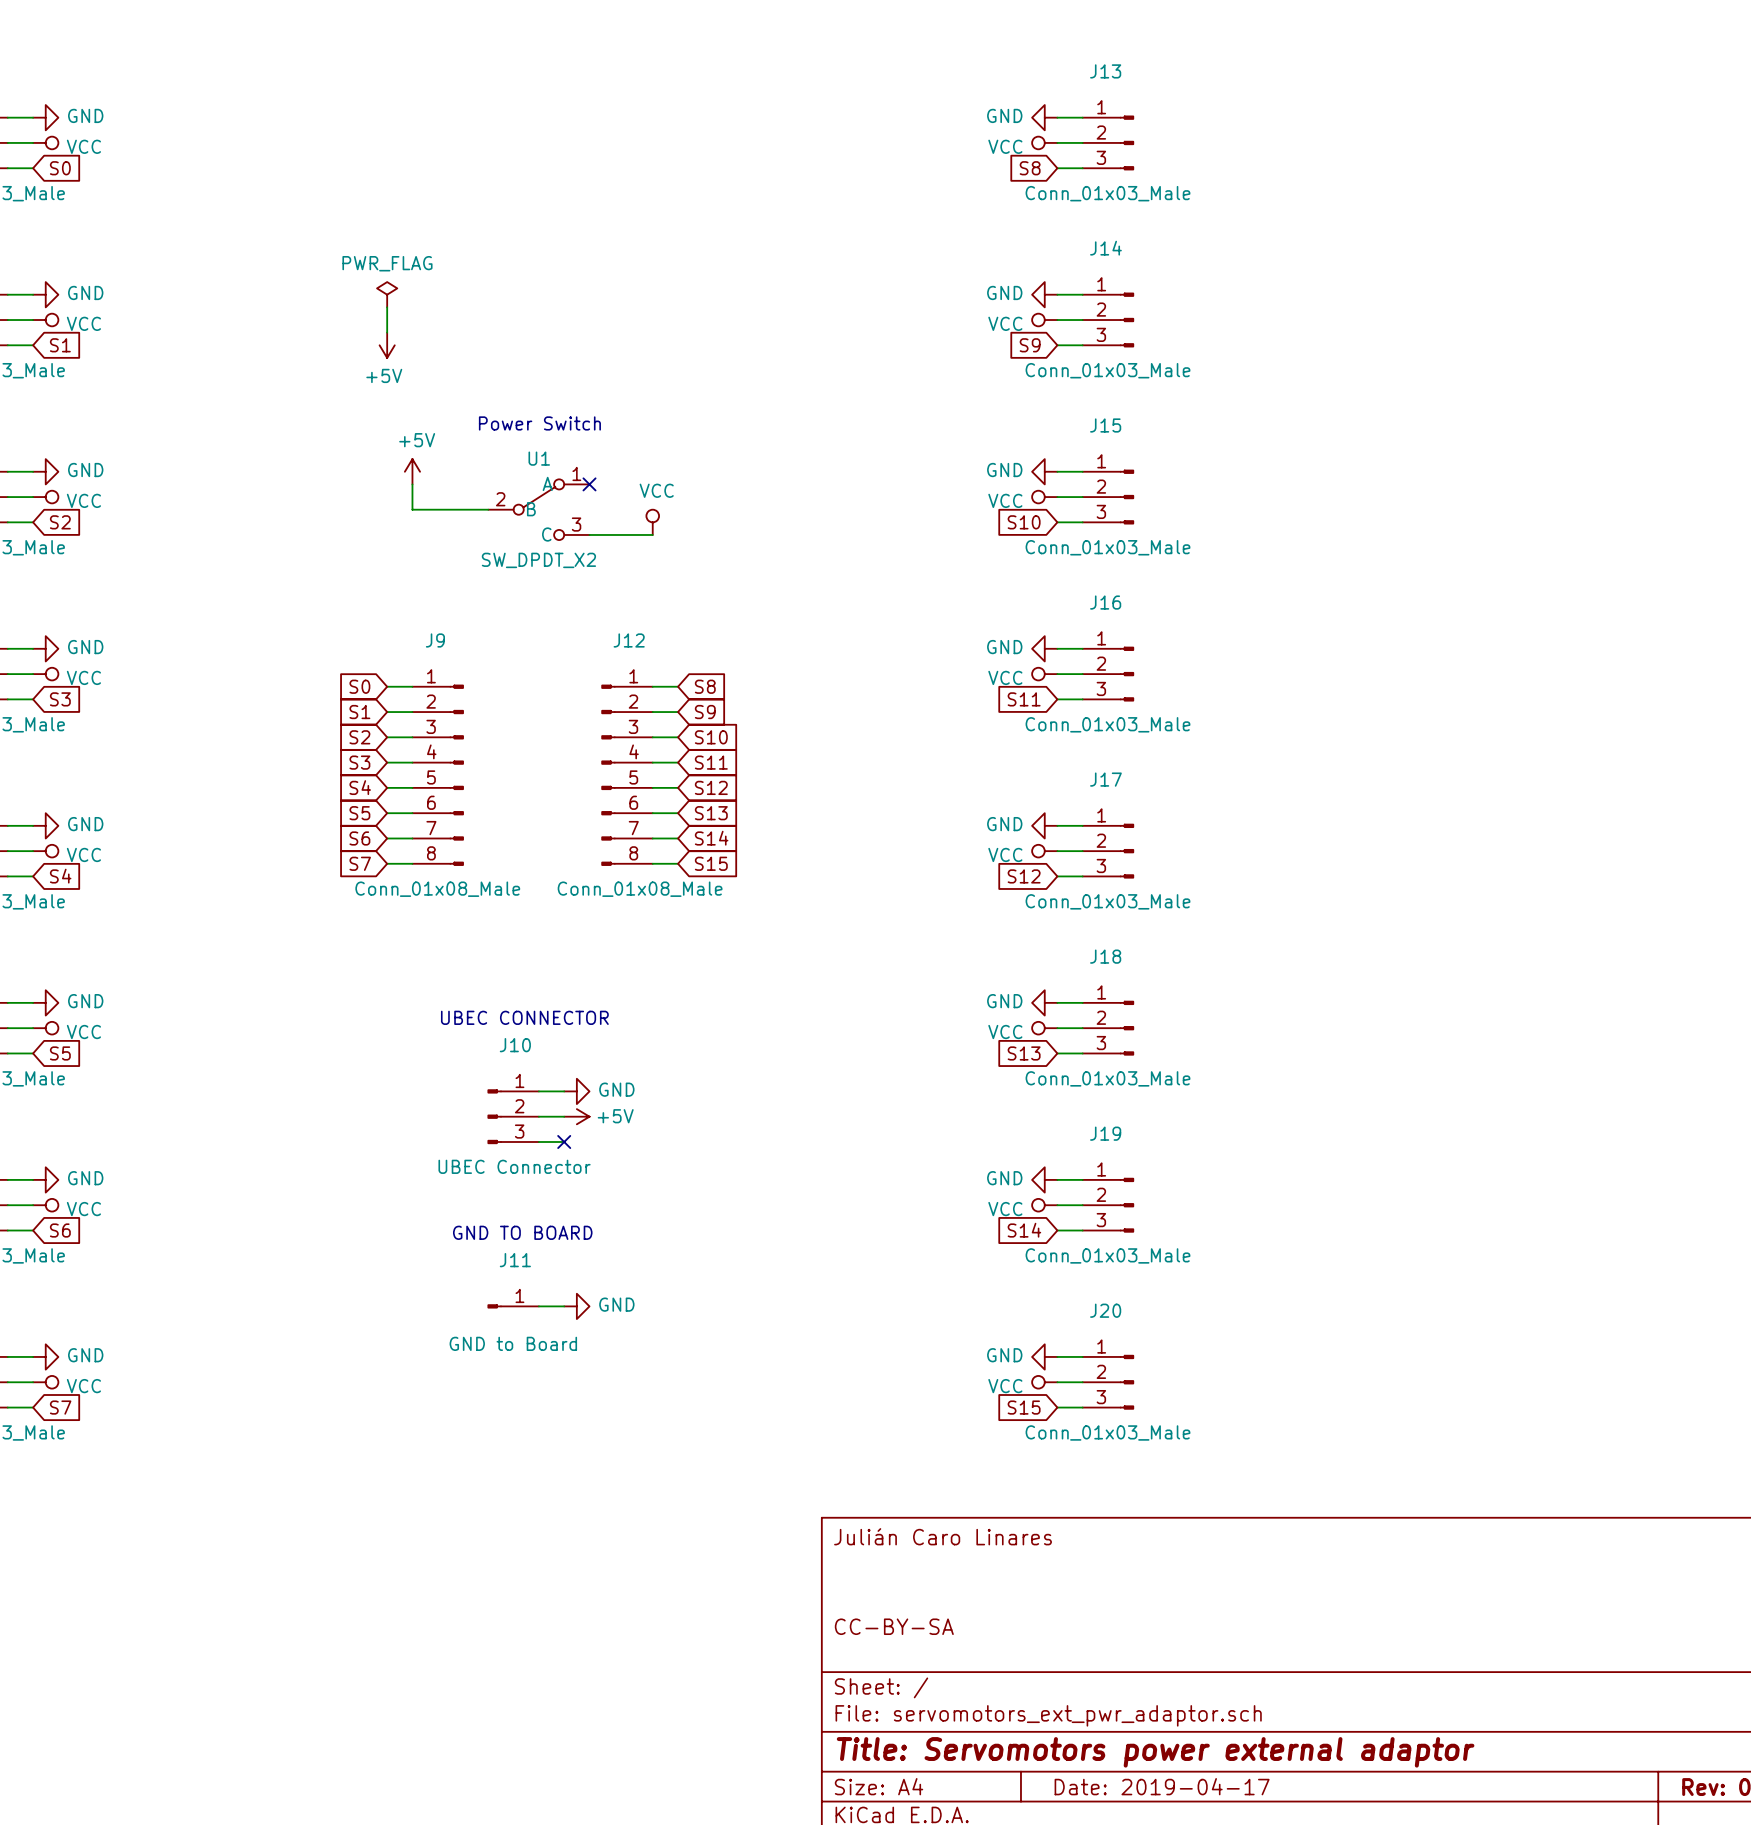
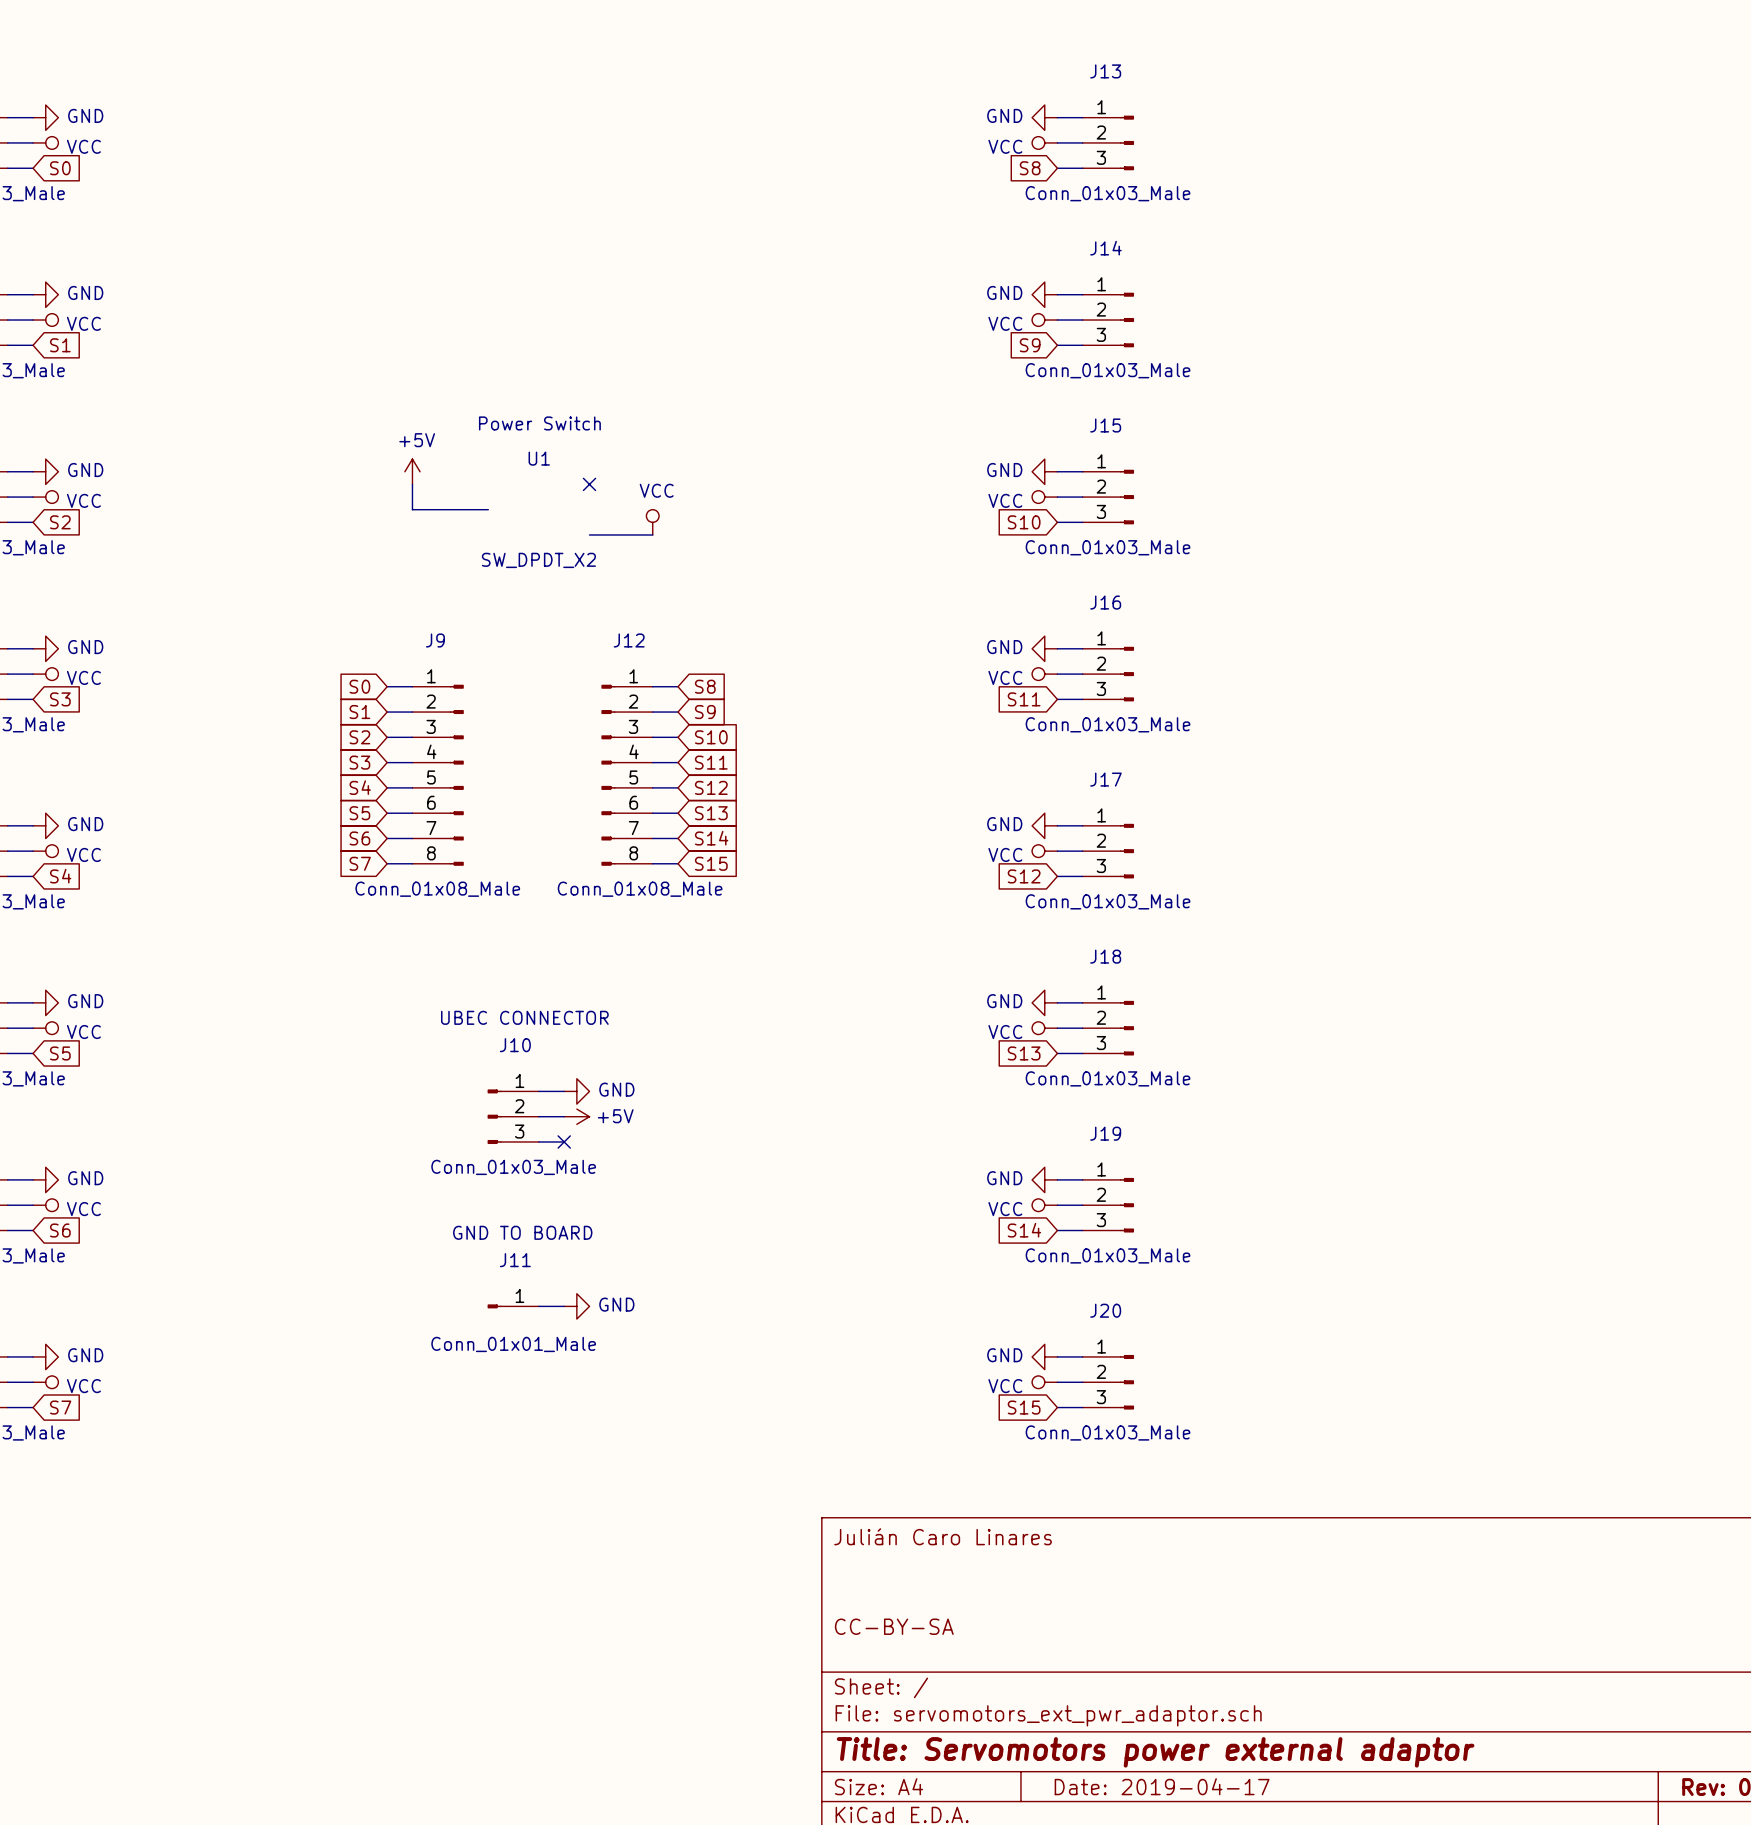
power symbol: PWR_FLAG (387, 294) -> none
wire: (387, 307) (387, 332) -> none
power symbol: +5V (387, 345) -> none
U1 symbol: [488, 479, 590, 541] -> [481, 451, 596, 569]
J10 value: UBEC Connector (514, 1166) -> Conn_01x03_Male (513, 1167)
J11 value: GND to Board (513, 1343) -> Conn_01x01_Male (513, 1344)

